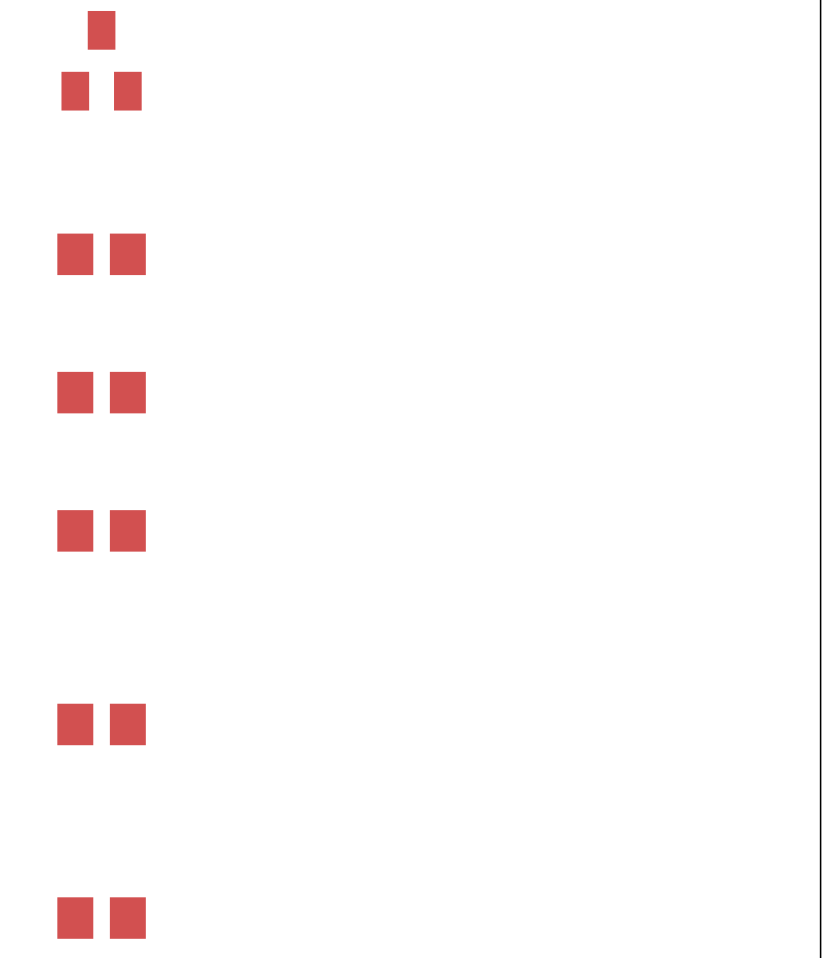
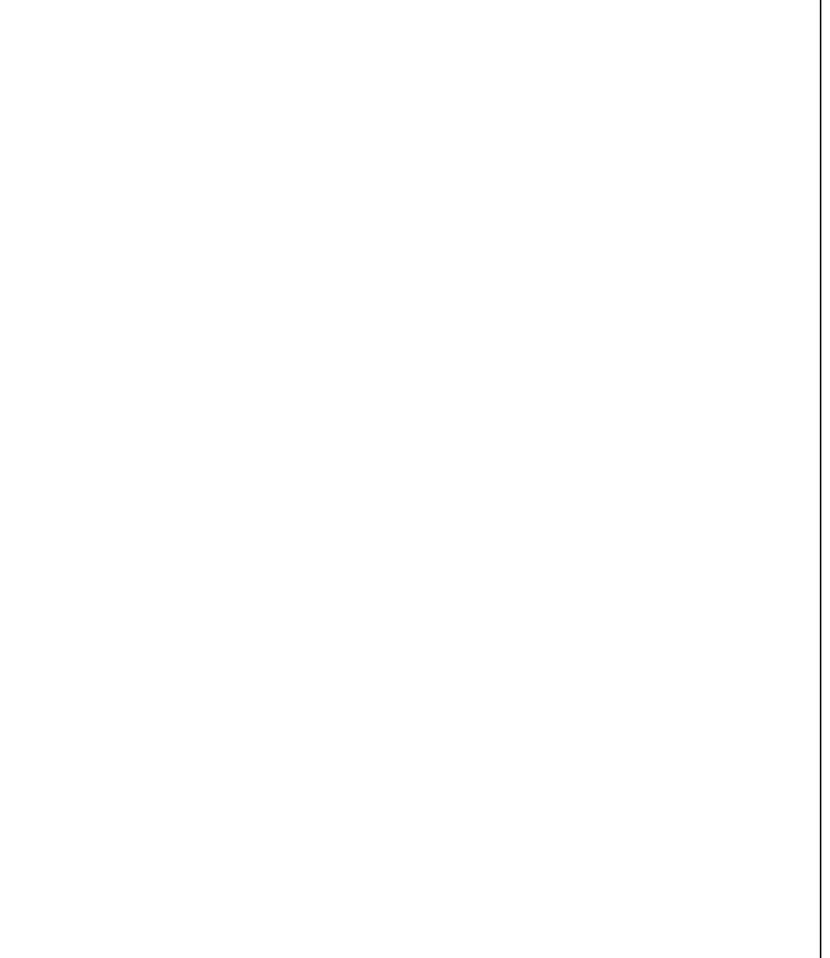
part: (101, 60) -> none
part: (101, 254) -> none
part: (101, 392) -> none
part: (101, 530) -> none
part: (101, 724) -> none
part: (101, 918) -> none

